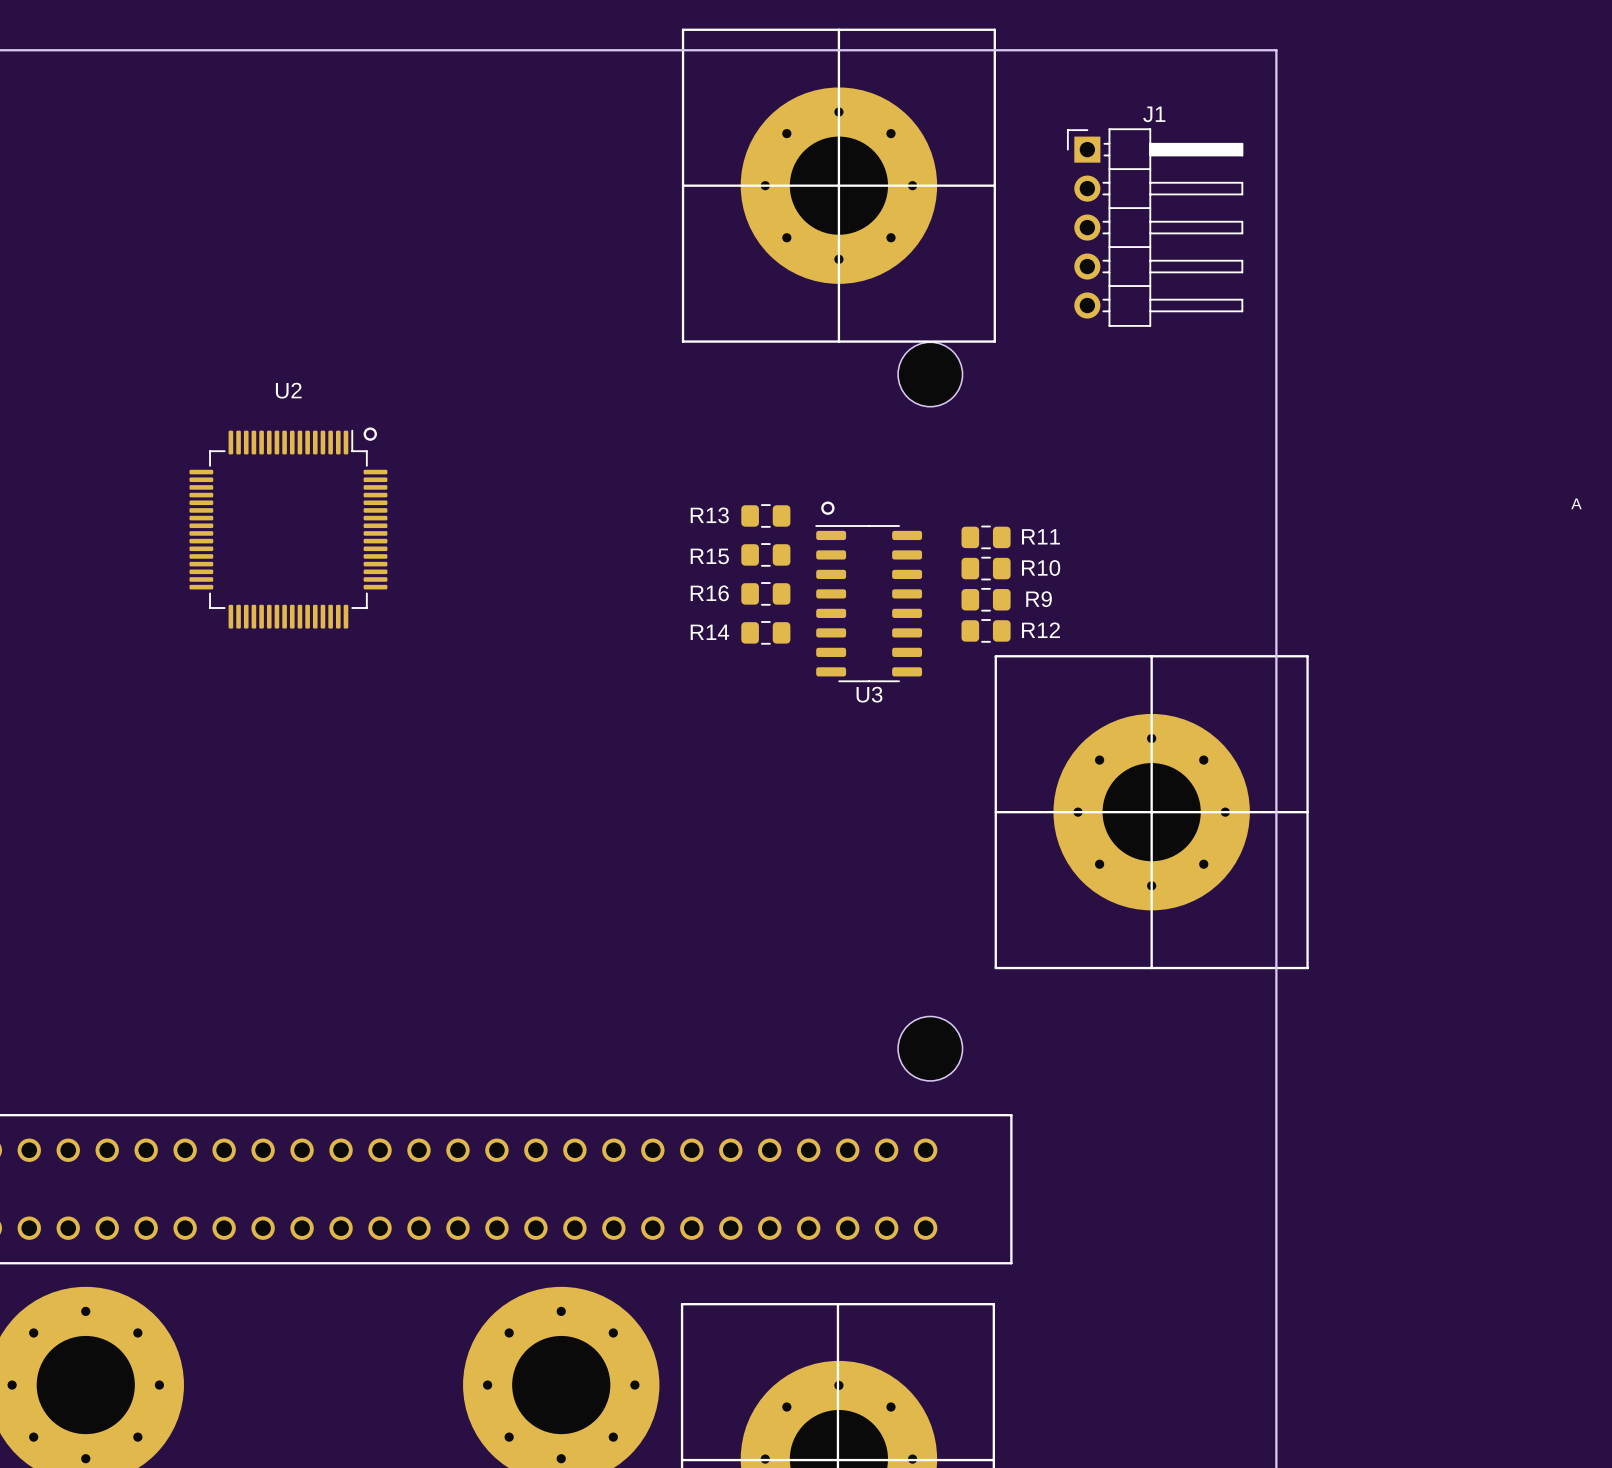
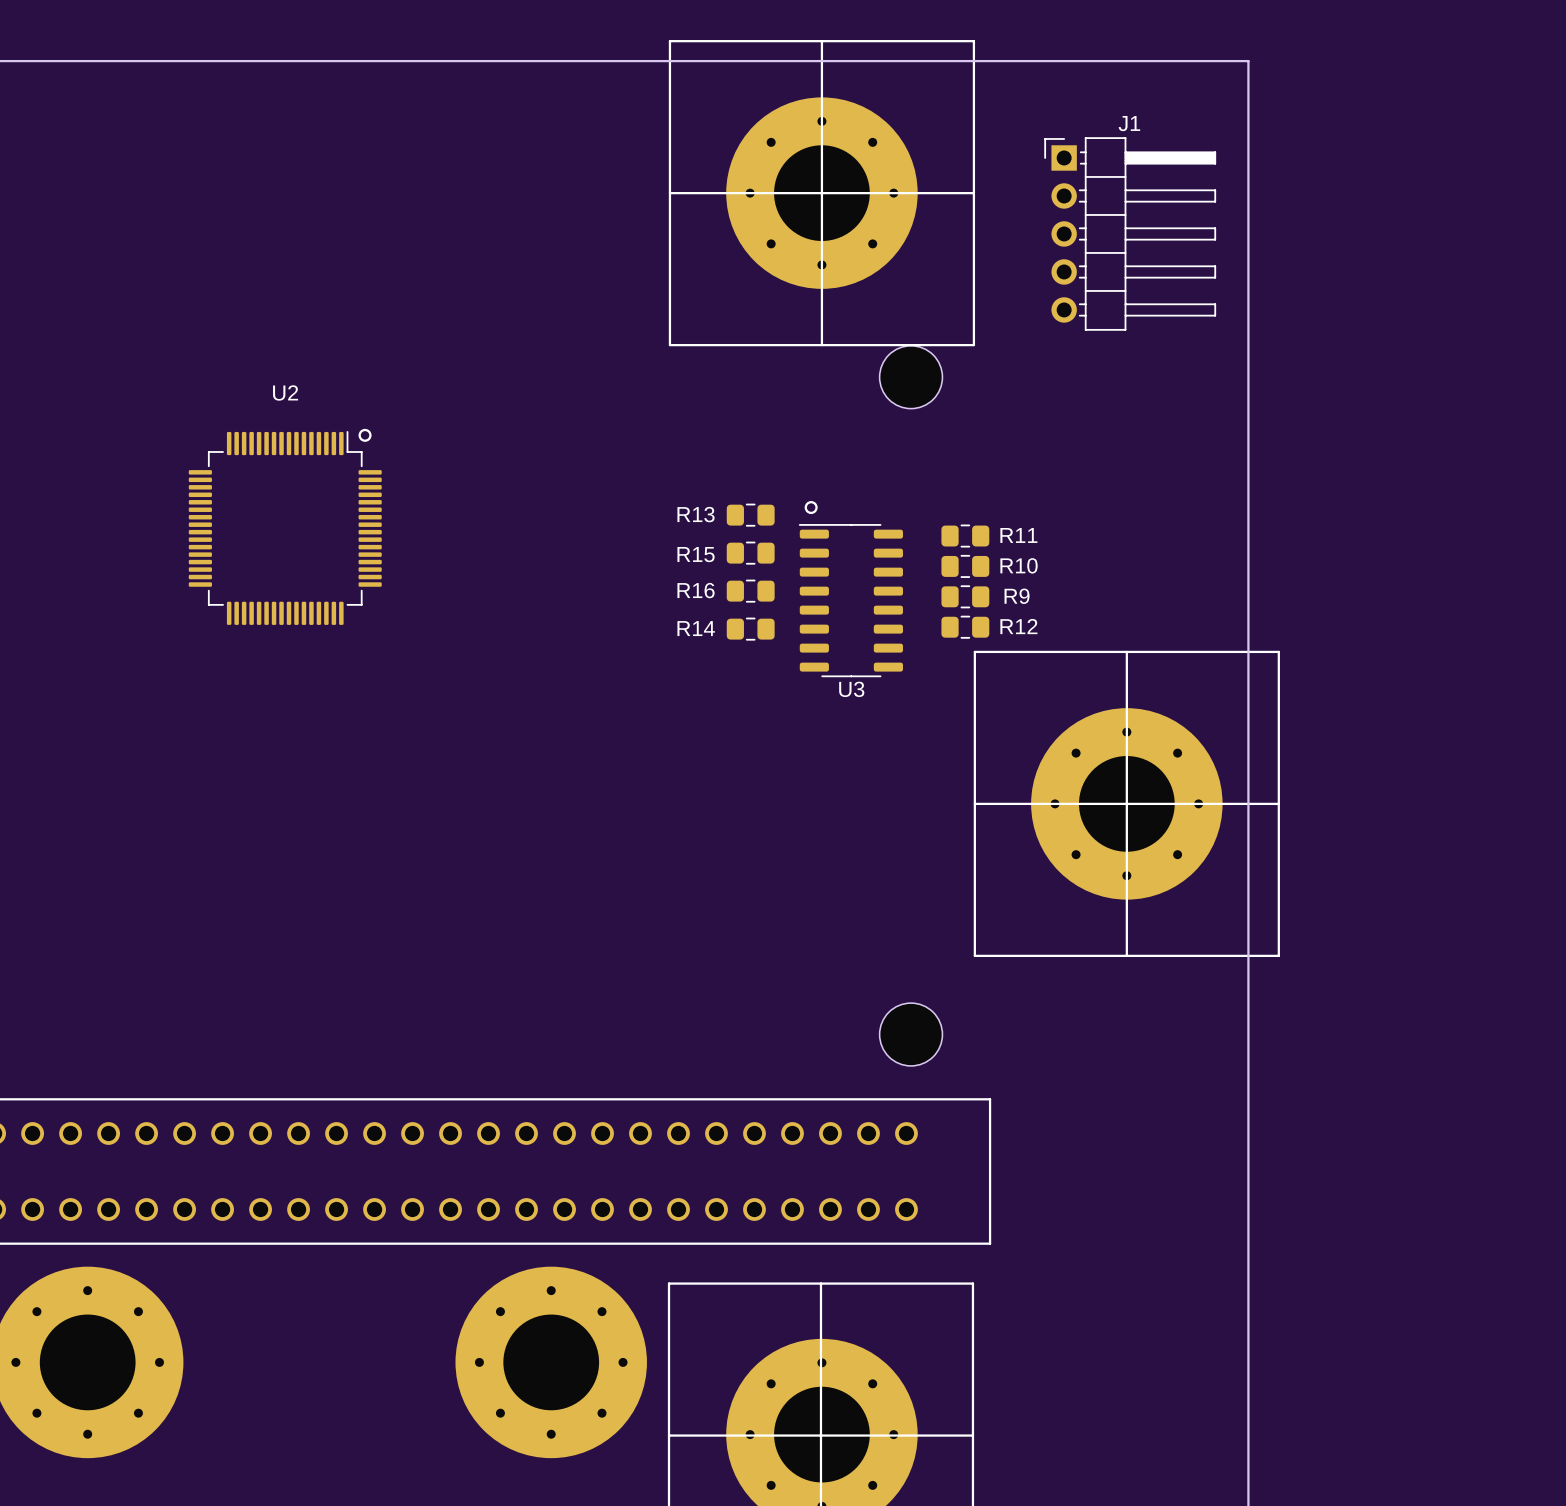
text: A (1576, 503) -> none

